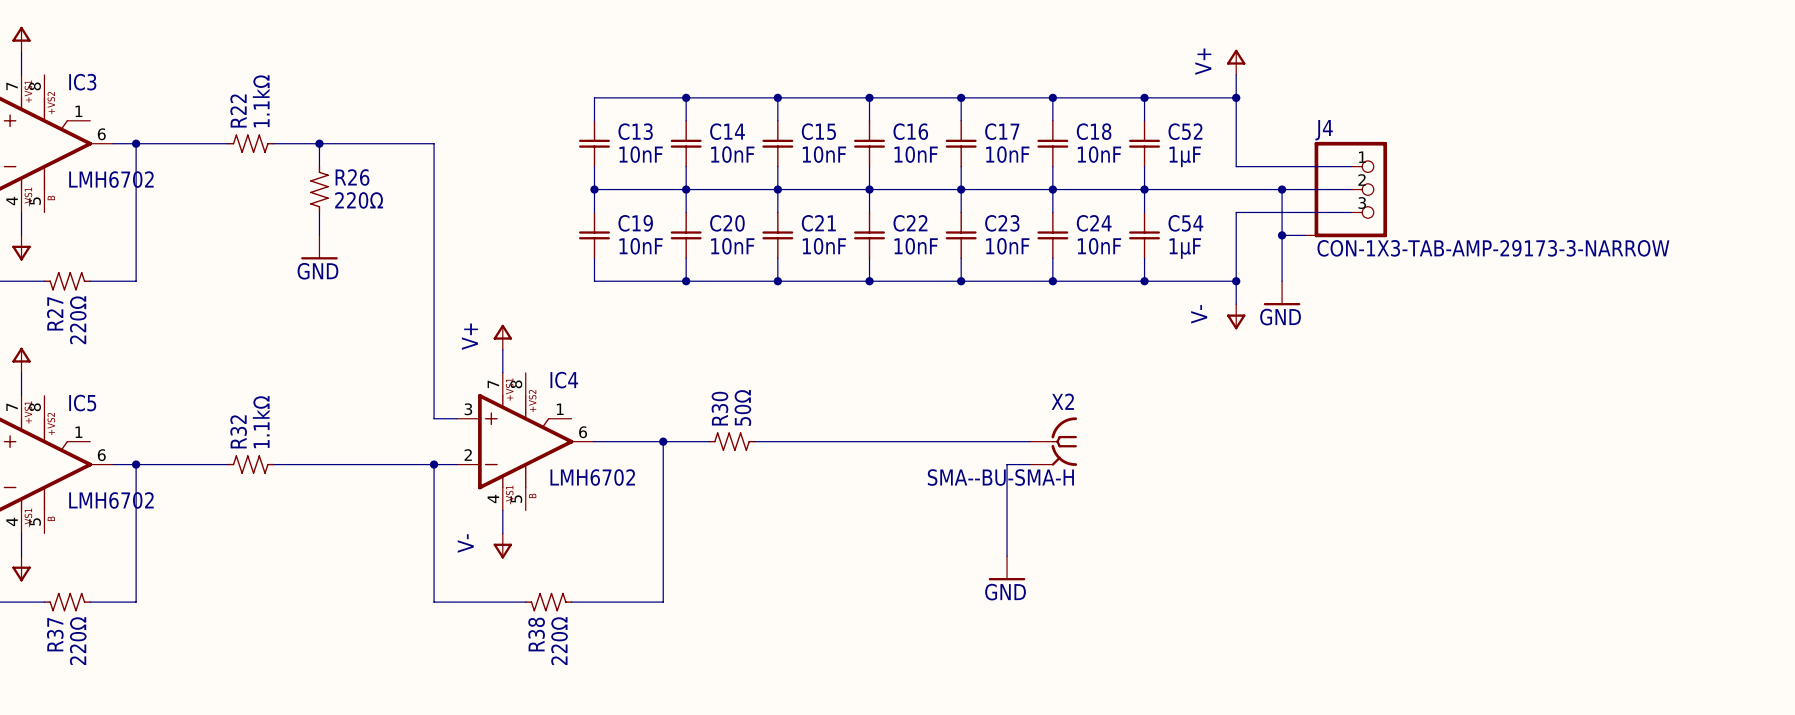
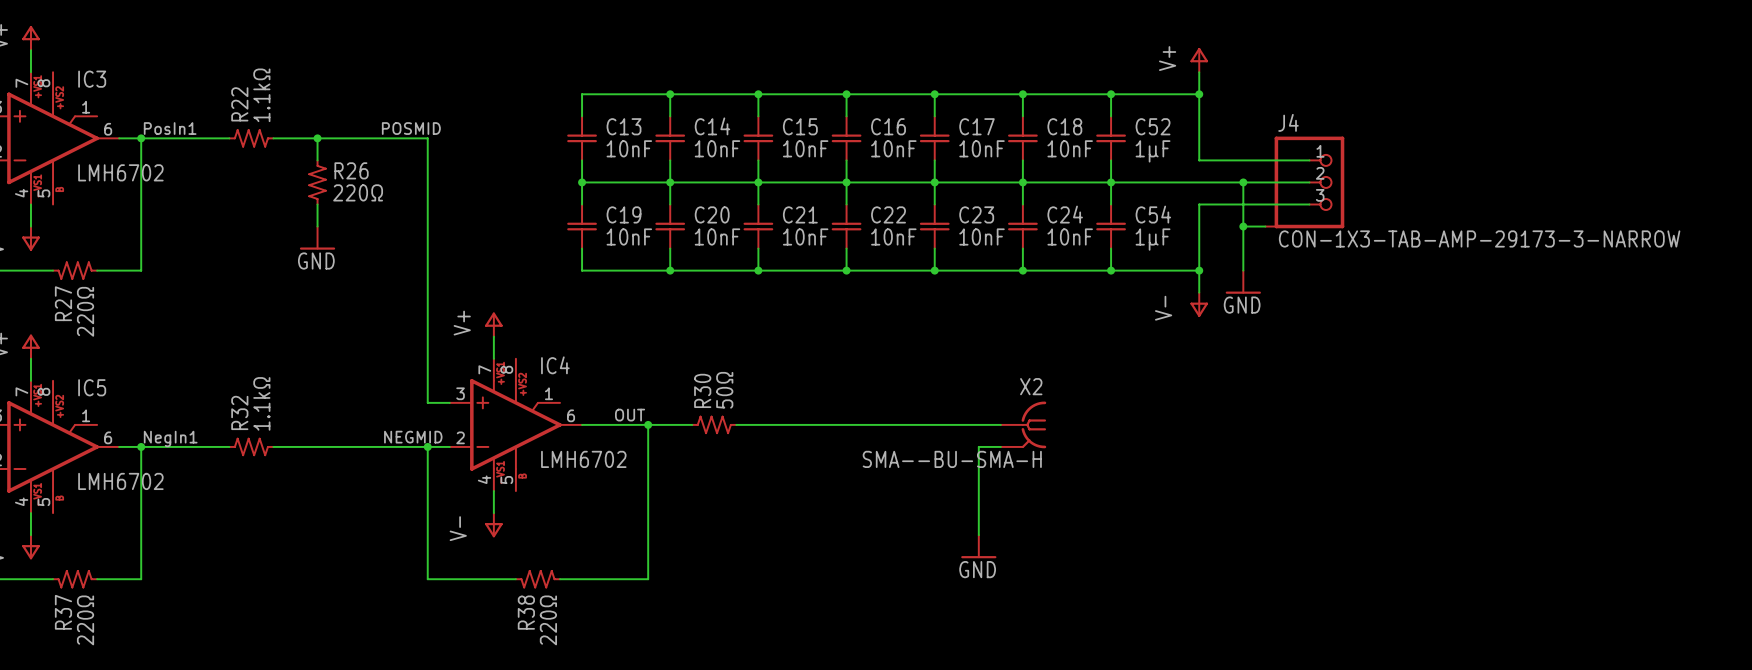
label: none -> PosIn1 (170, 128)
label: none -> POSMID (411, 128)
label: none -> OUT (630, 415)
label: none -> NEGMID (413, 437)
label: none -> NegIn1 (170, 438)

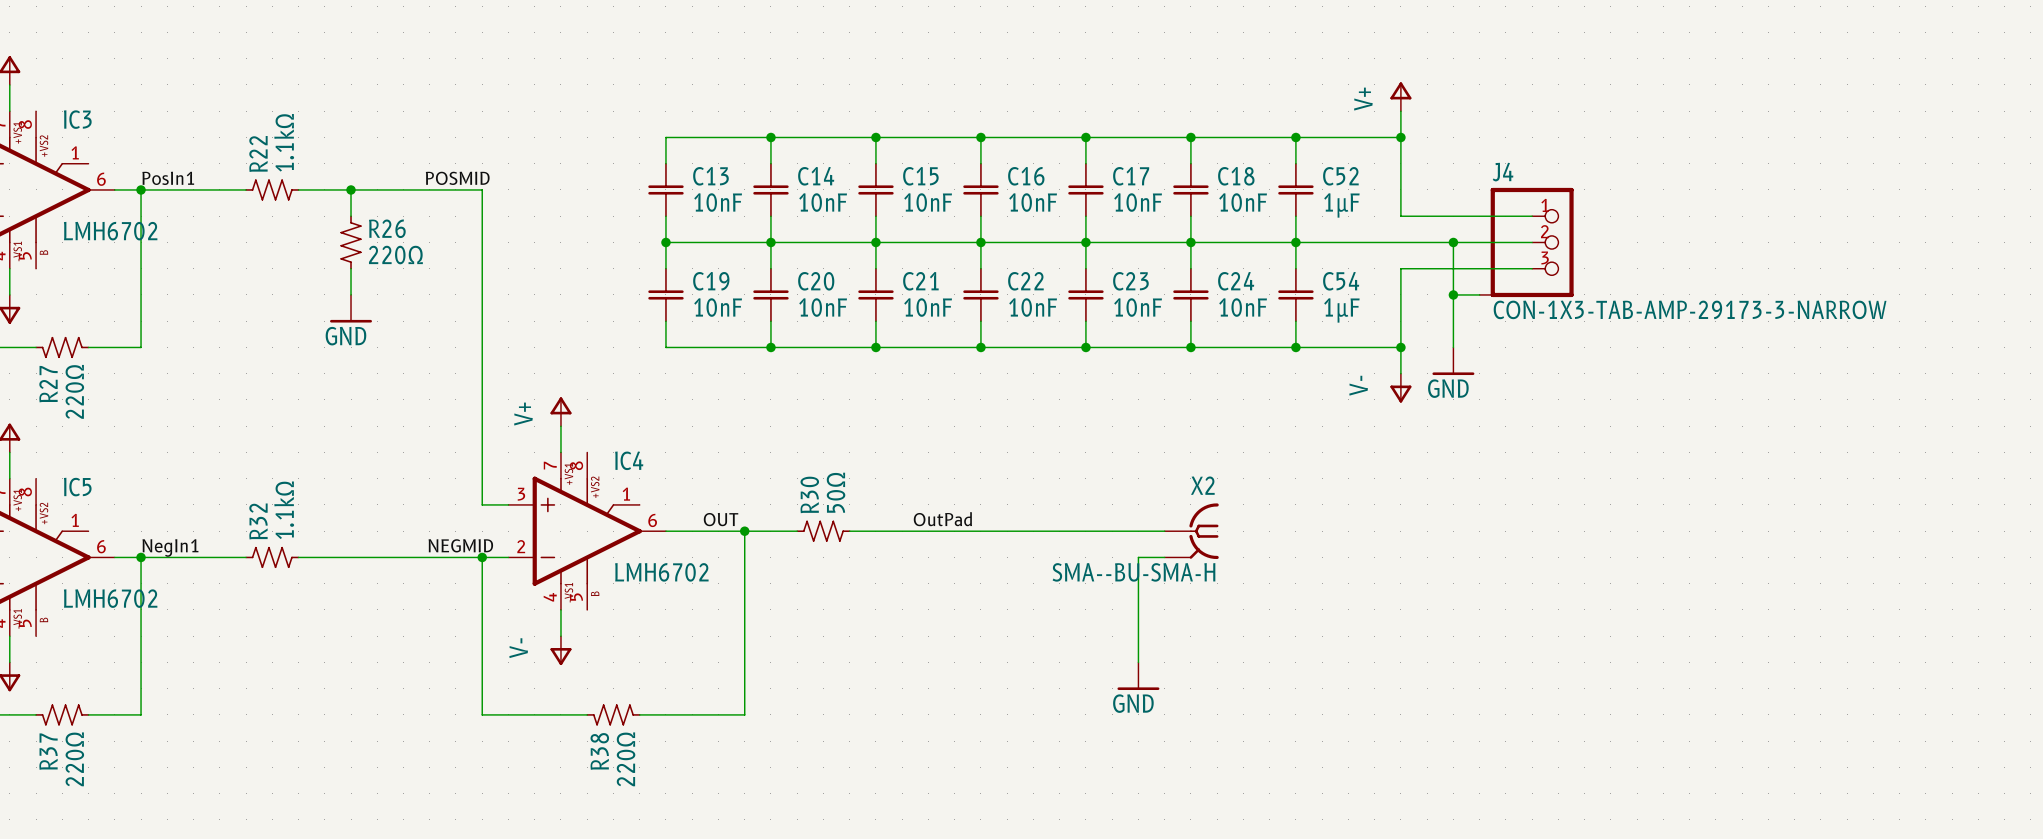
label: none -> OutPad (942, 519)

